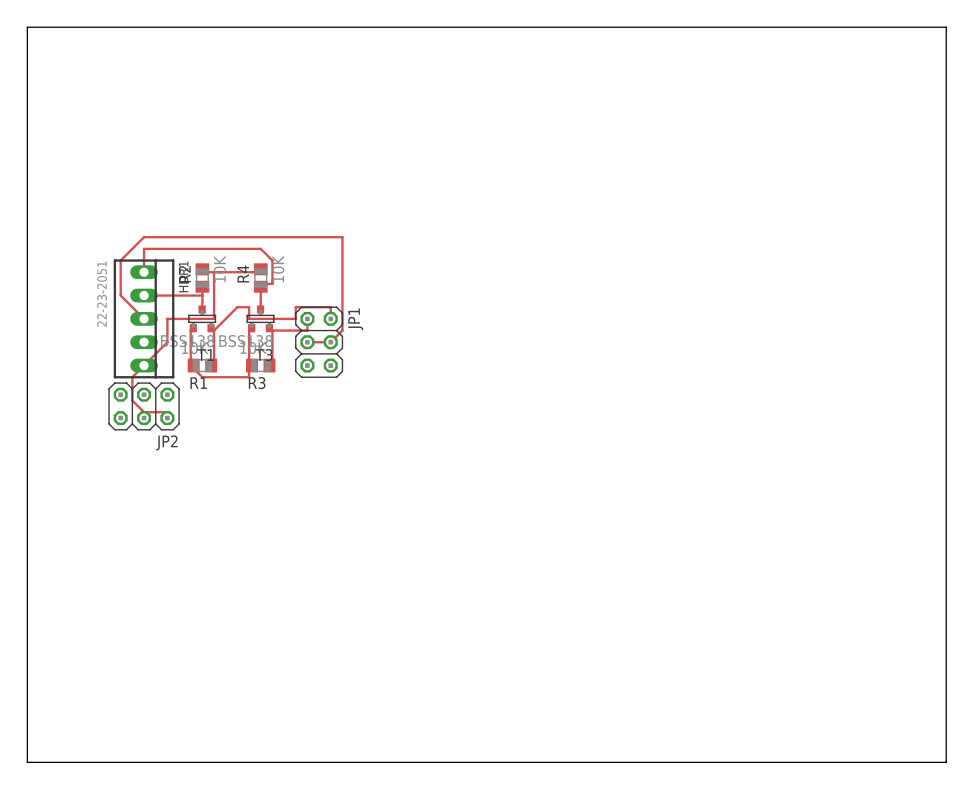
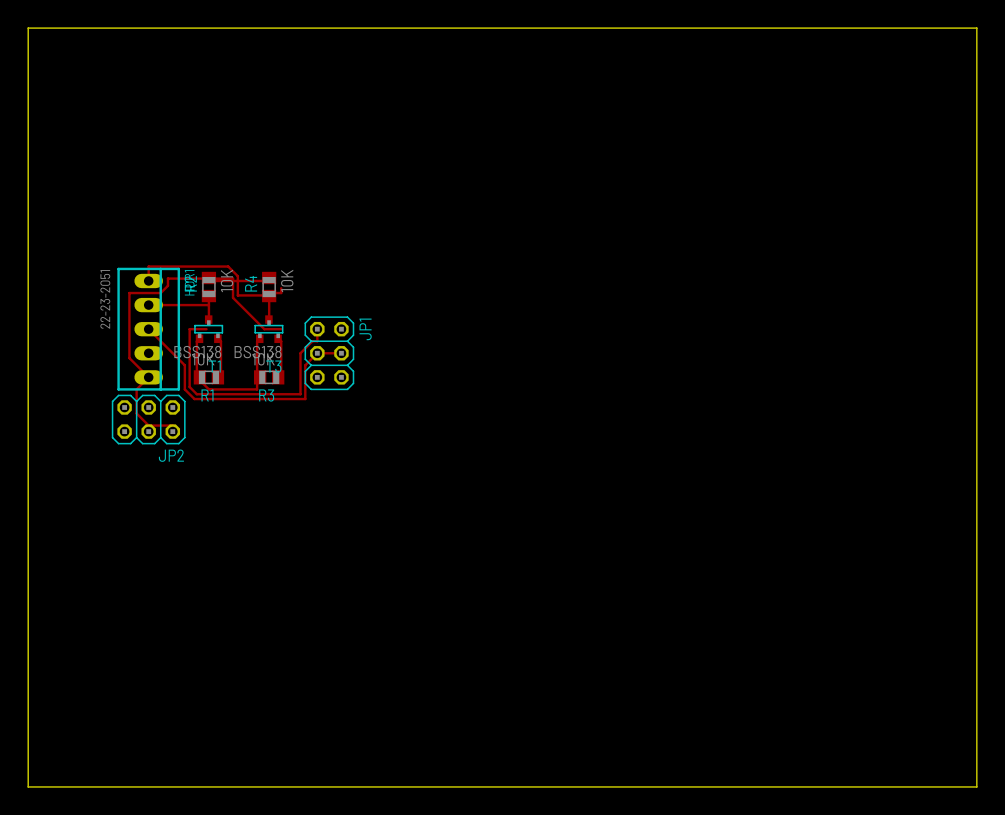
track: (144, 258) (144, 248) (260, 248) (272, 260) (272, 279) -> (148, 266) (228, 266) (237, 276) (237, 295) (269, 295)
track: (214, 272) (214, 318) (200, 318) -> none
track: (144, 318) (120, 295) (120, 260) (144, 237) (342, 237) (342, 330) (330, 342) -> (148, 329) (184, 365) (184, 389) (194, 399) (305, 399) (305, 365) (317, 353)
track: (183, 318) (167, 318) (167, 342) (144, 365) -> (264, 329) (233, 297) (233, 278) (167, 278) (167, 285) (160, 293) (129, 293) (129, 358) (148, 377)
track: (256, 318) (249, 318) (249, 307) (237, 307) (214, 330) -> none
track: (272, 318) (295, 318) (295, 307) (330, 307) (330, 318) -> none
track: (272, 330) (302, 330) -> (189, 329) (189, 387) (196, 394) (300, 394) (300, 353) (312, 341)

